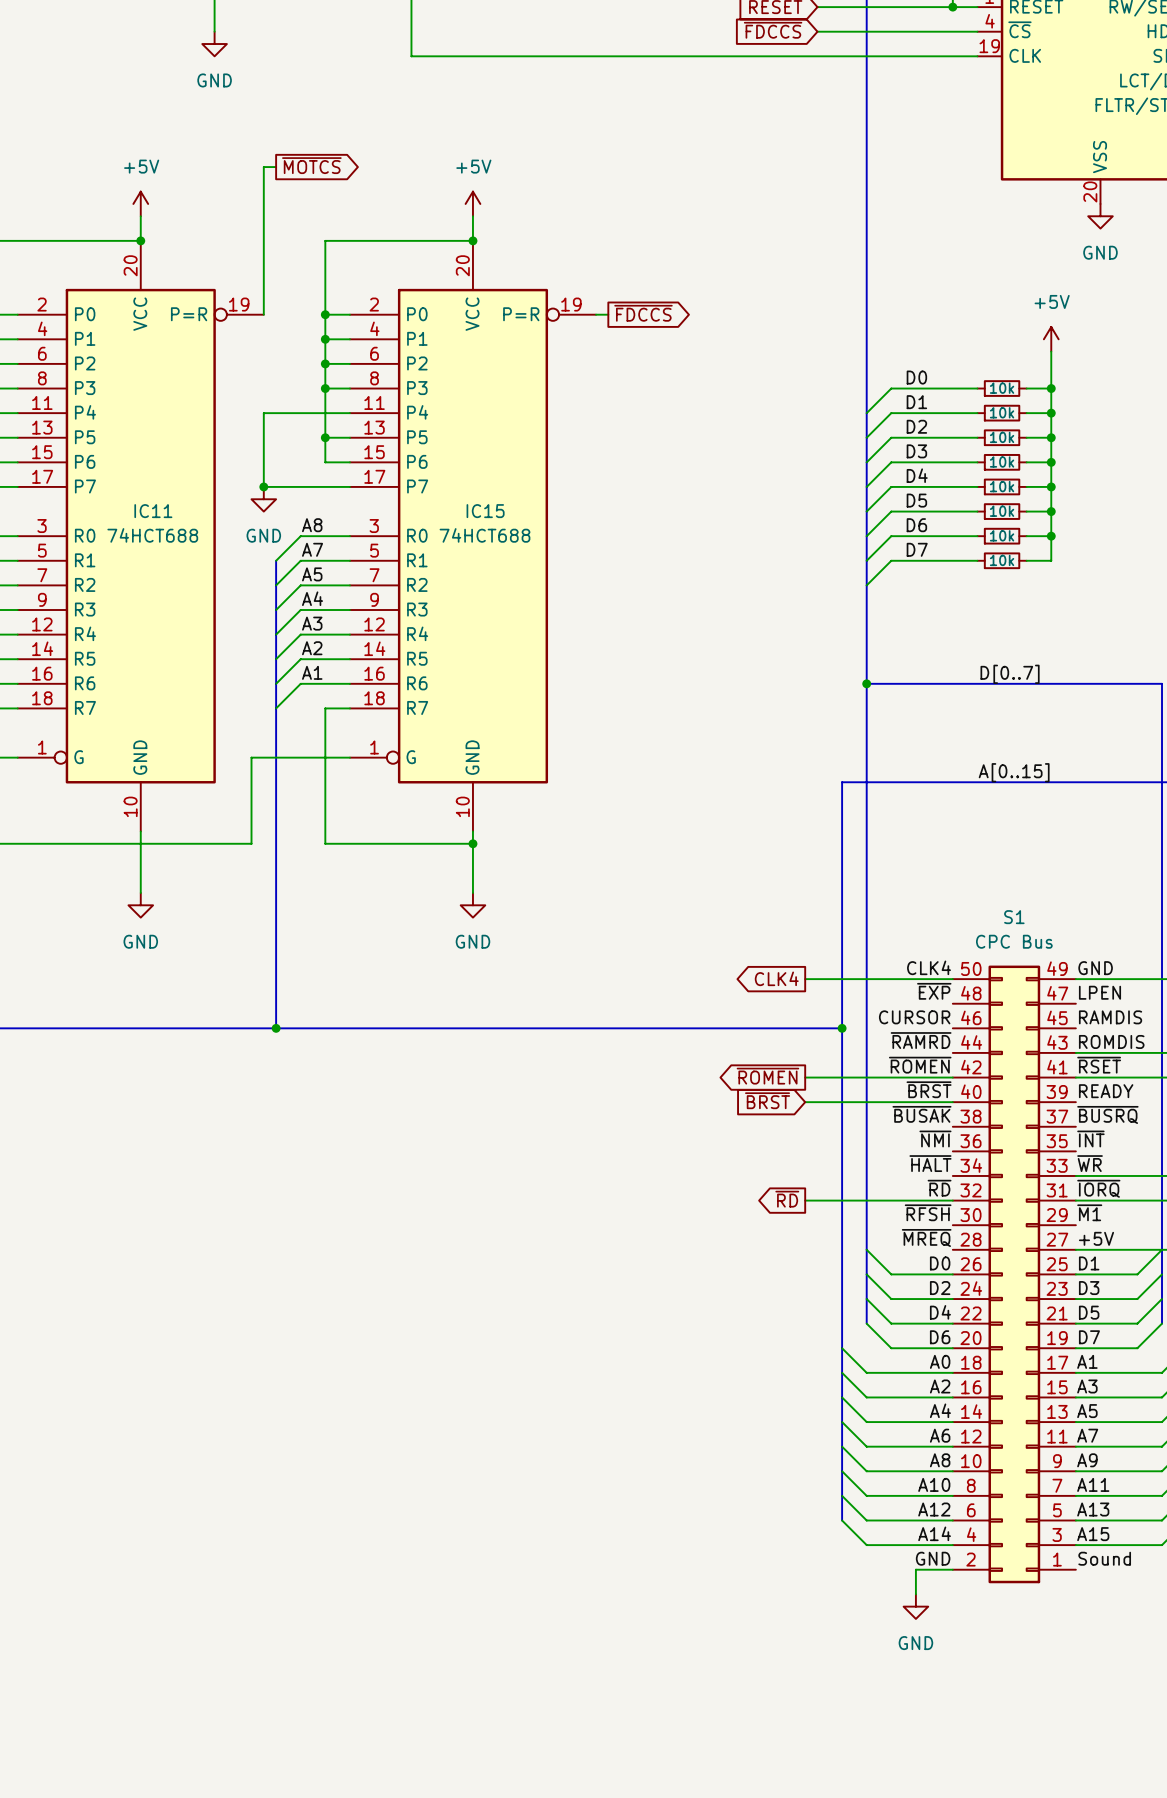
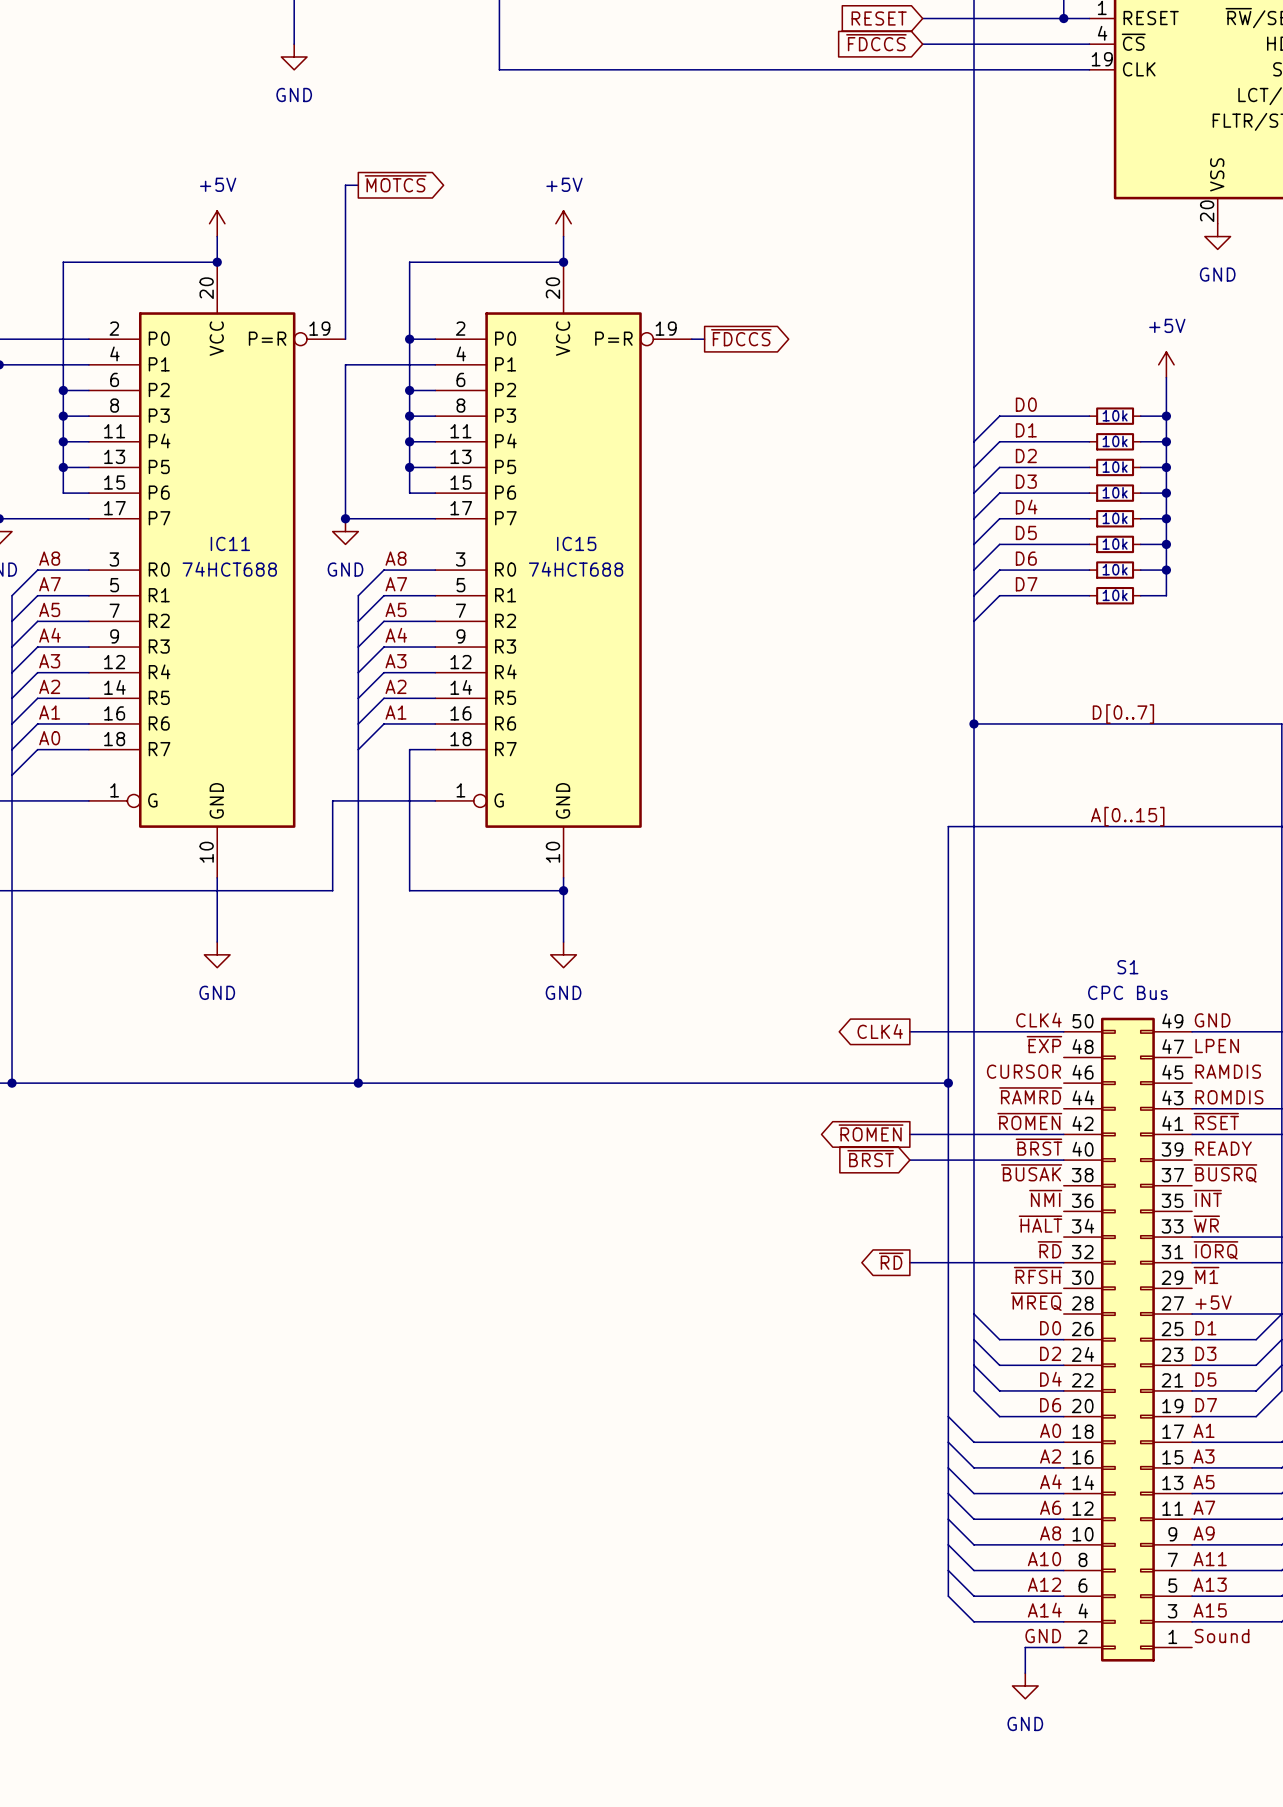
junction: (325, 339) -> none
wire: (263, 413) (325, 413) -> (345, 441) (345, 364) (409, 364)
junction: none -> (409, 441)

